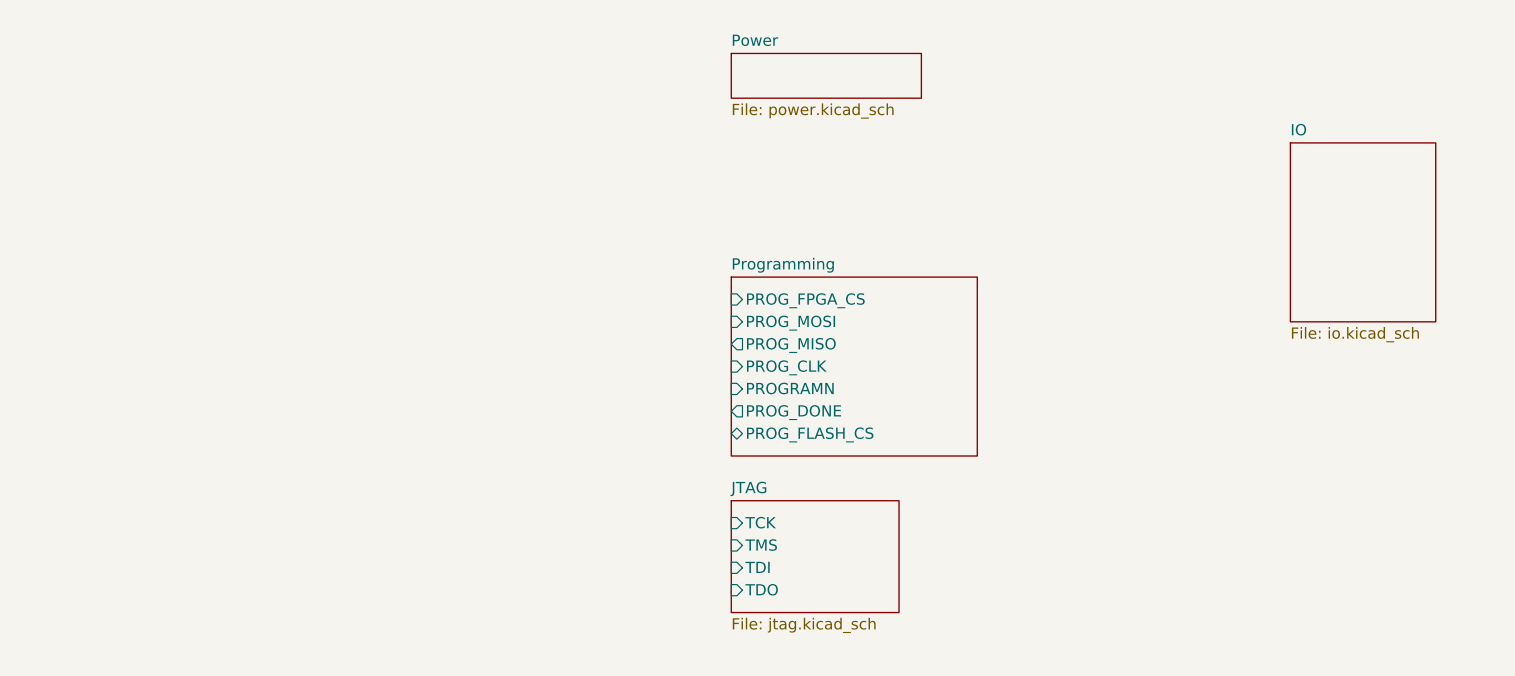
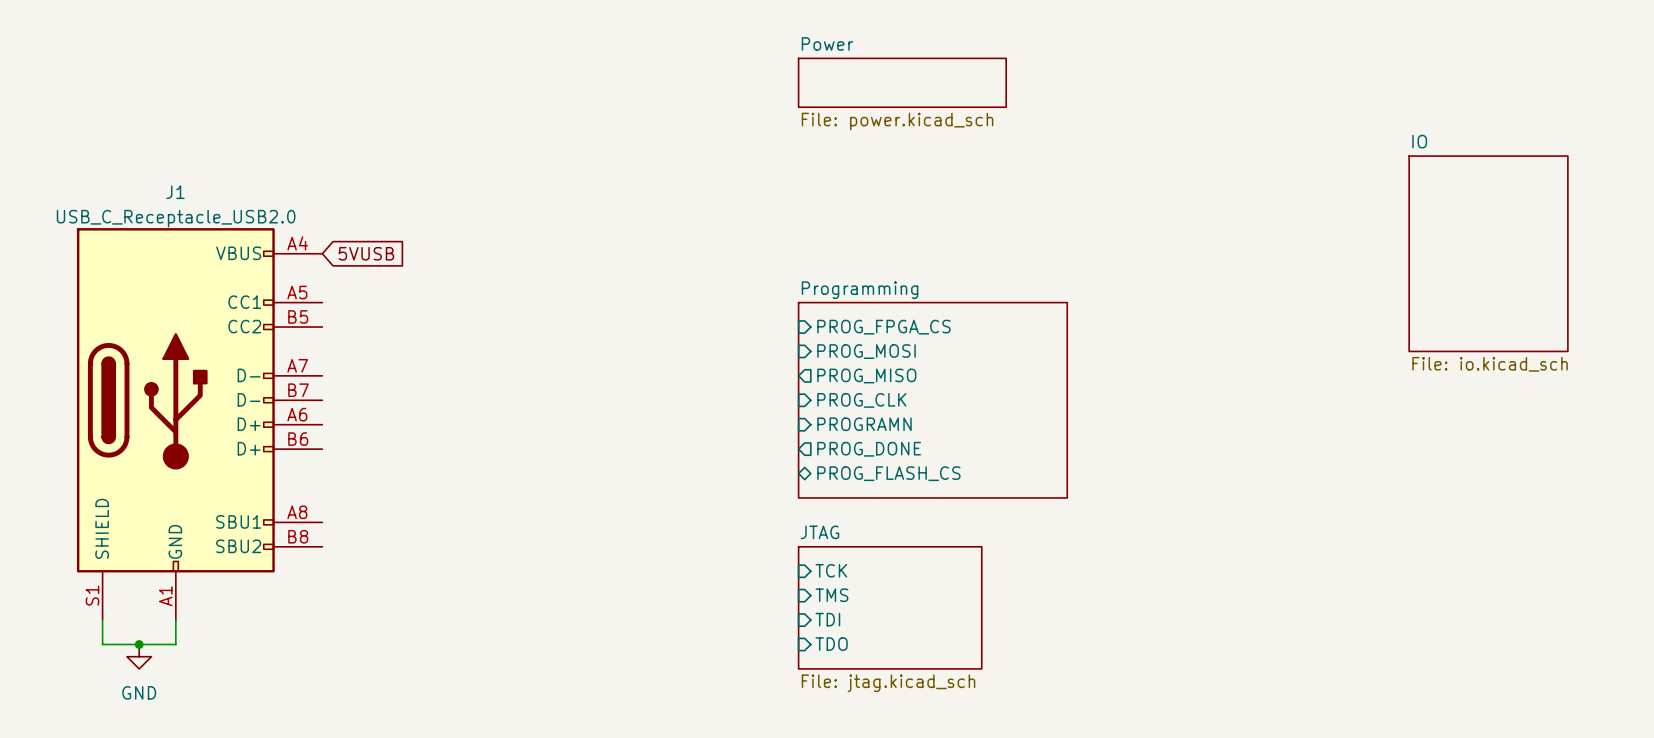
global label: none -> 5VUSB (366, 253)
J1: none -> USB_C_Receptacle_USB2.0 (199, 424)
wire: none -> (102, 620) (102, 644) (175, 644) (175, 620)
junction: none -> (139, 644)
power symbol: none -> GND (139, 656)

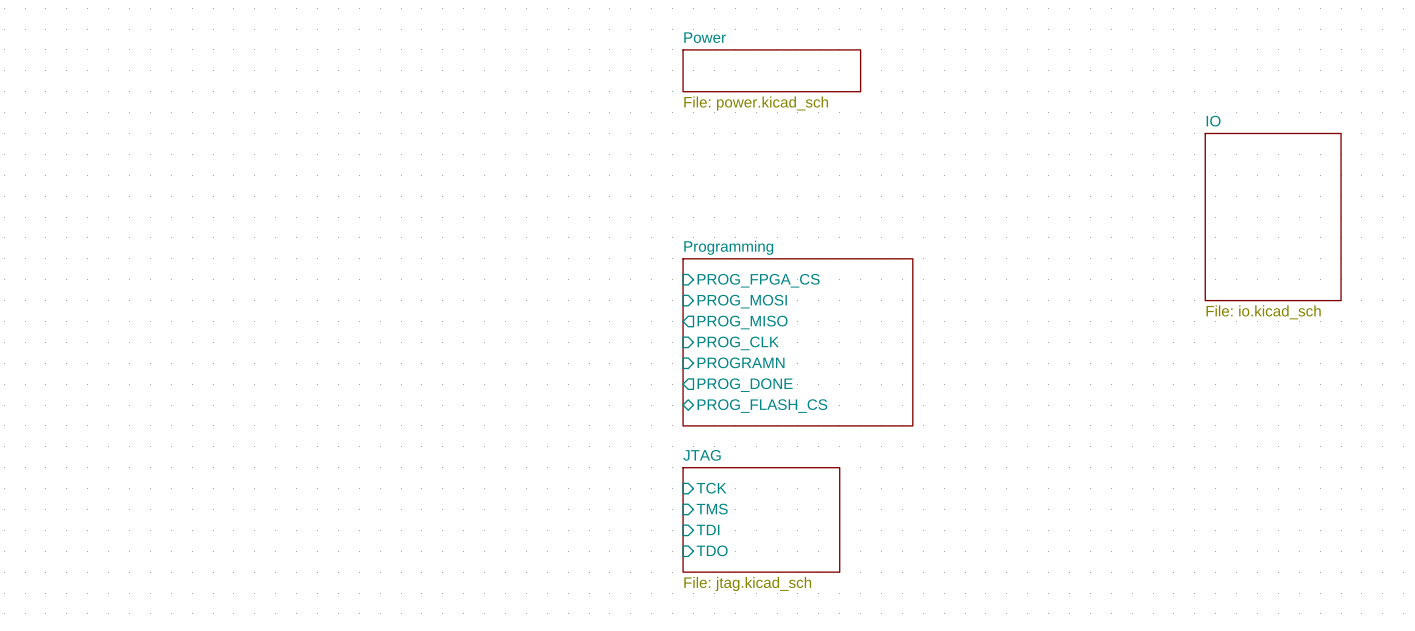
global label: 5VUSB (366, 253) -> none
J1: USB_C_Receptacle_USB2.0 (199, 424) -> none
wire: (102, 620) (102, 644) (175, 644) (175, 620) -> none
junction: (139, 644) -> none
power symbol: GND (139, 656) -> none

